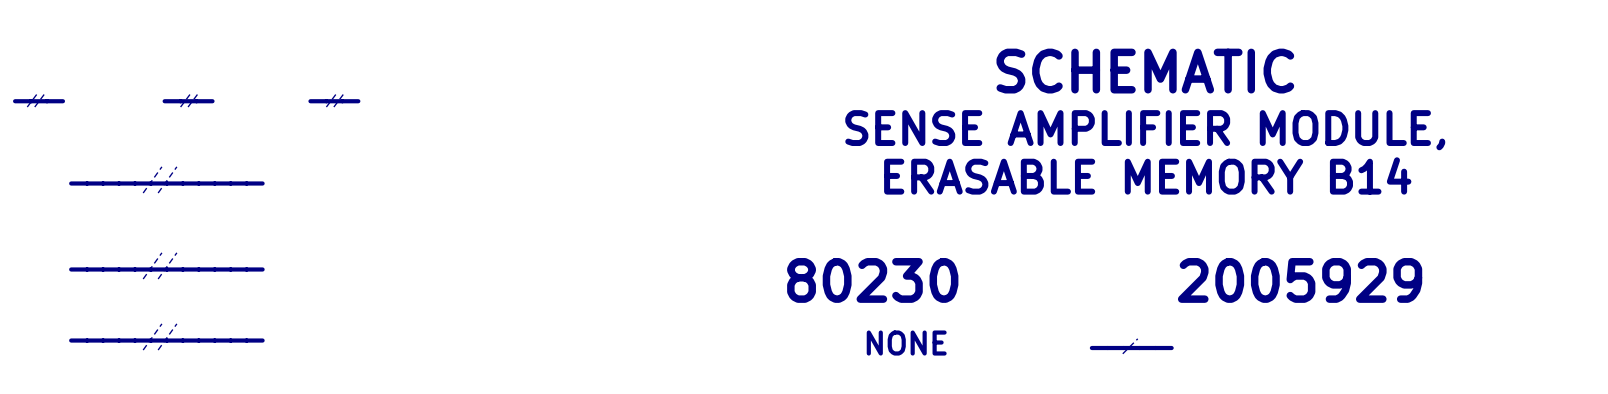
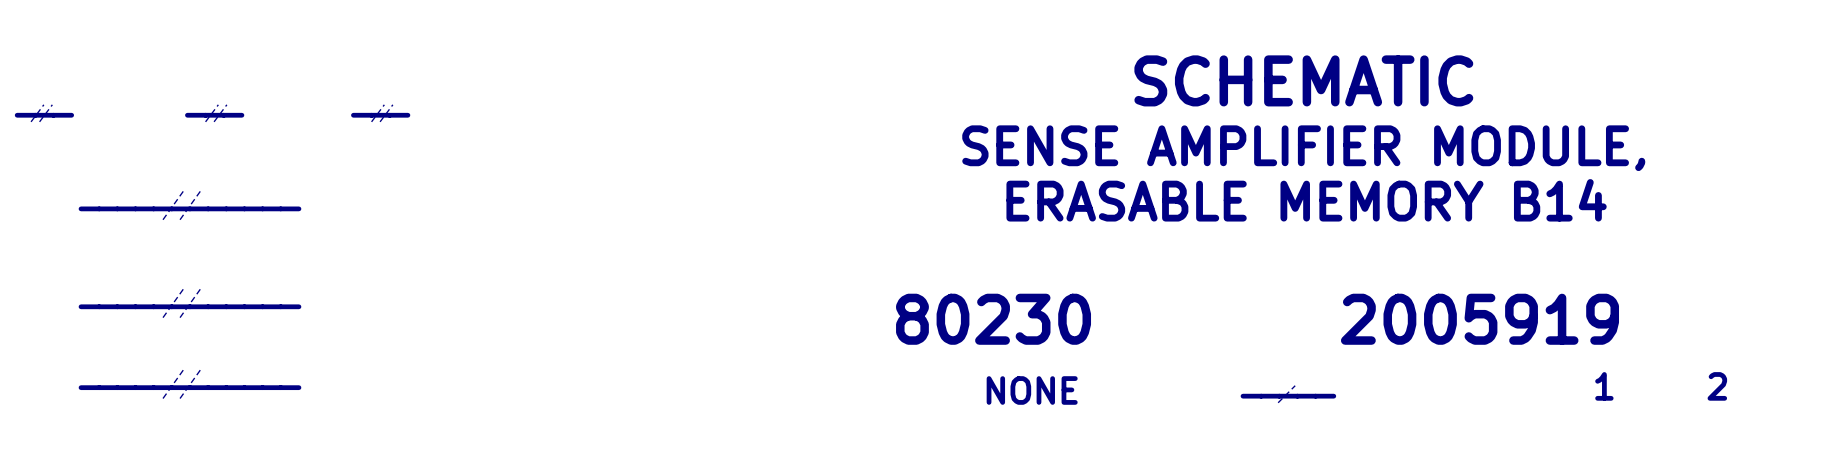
text: 2005929 (1300, 280) -> 2005919 (1479, 319)
text: none -> 1 2 (1661, 386)

